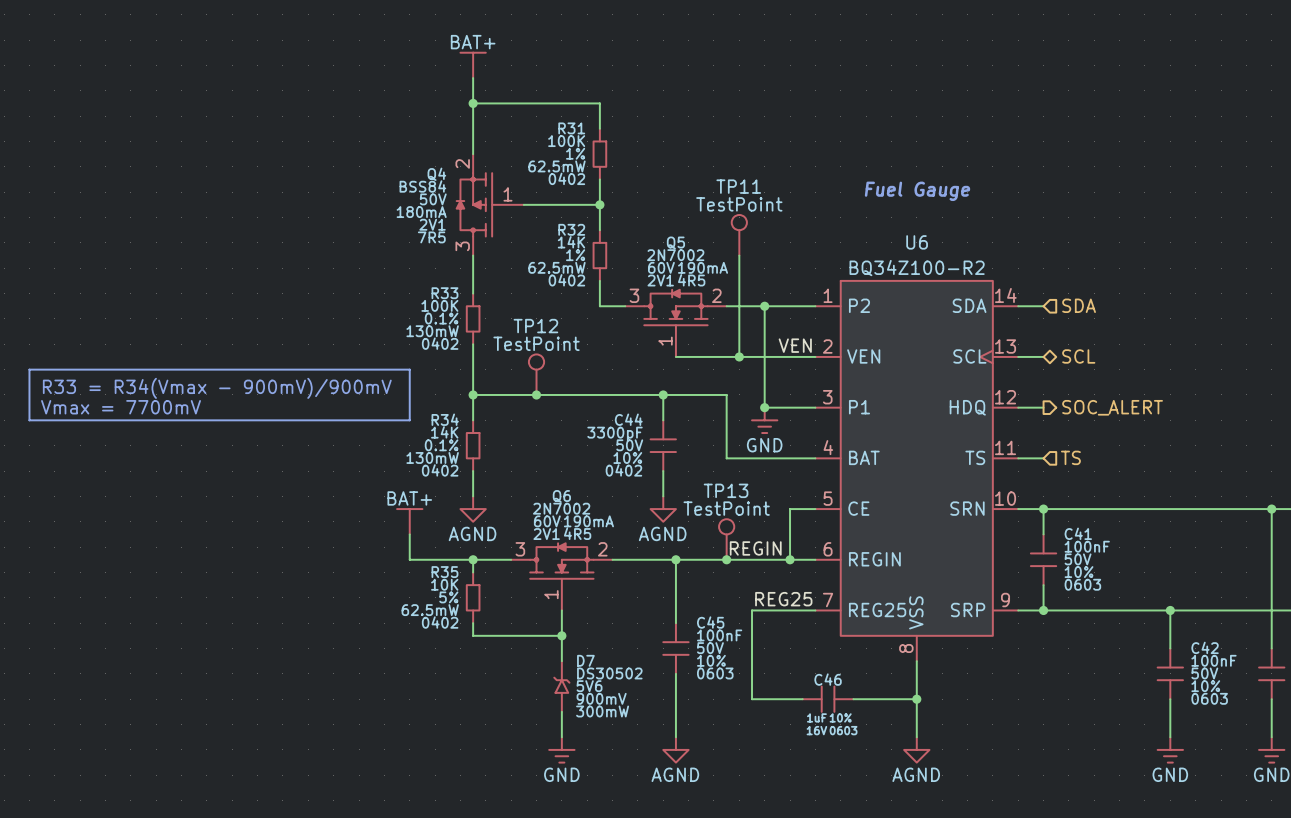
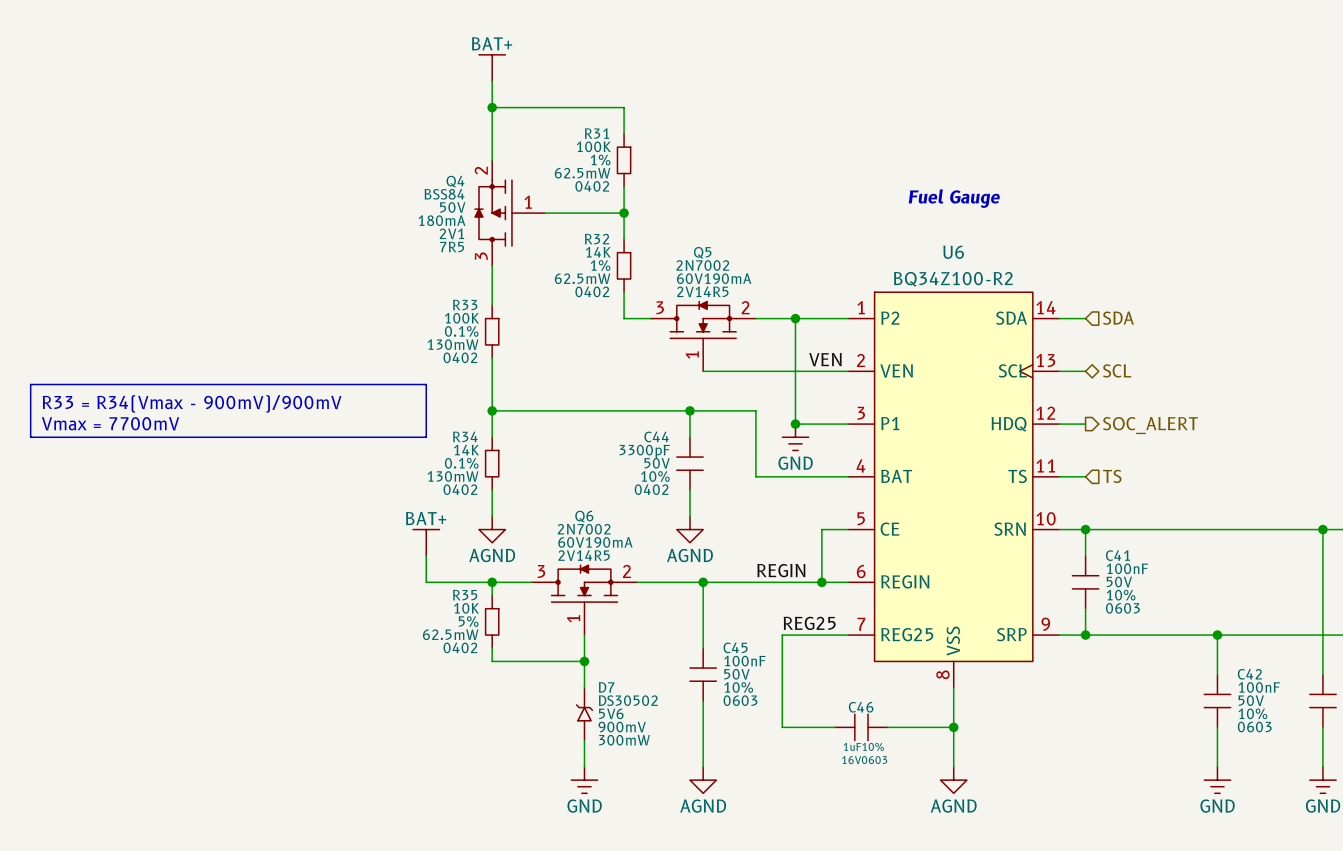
TP11: TestPoint (739, 235) -> none
wire: (739, 255) (739, 356) -> none
junction: (739, 356) -> none
TP12: TestPoint (536, 374) -> none
junction: (536, 394) -> none
TP13: TestPoint (726, 539) -> none
junction: (726, 559) -> none

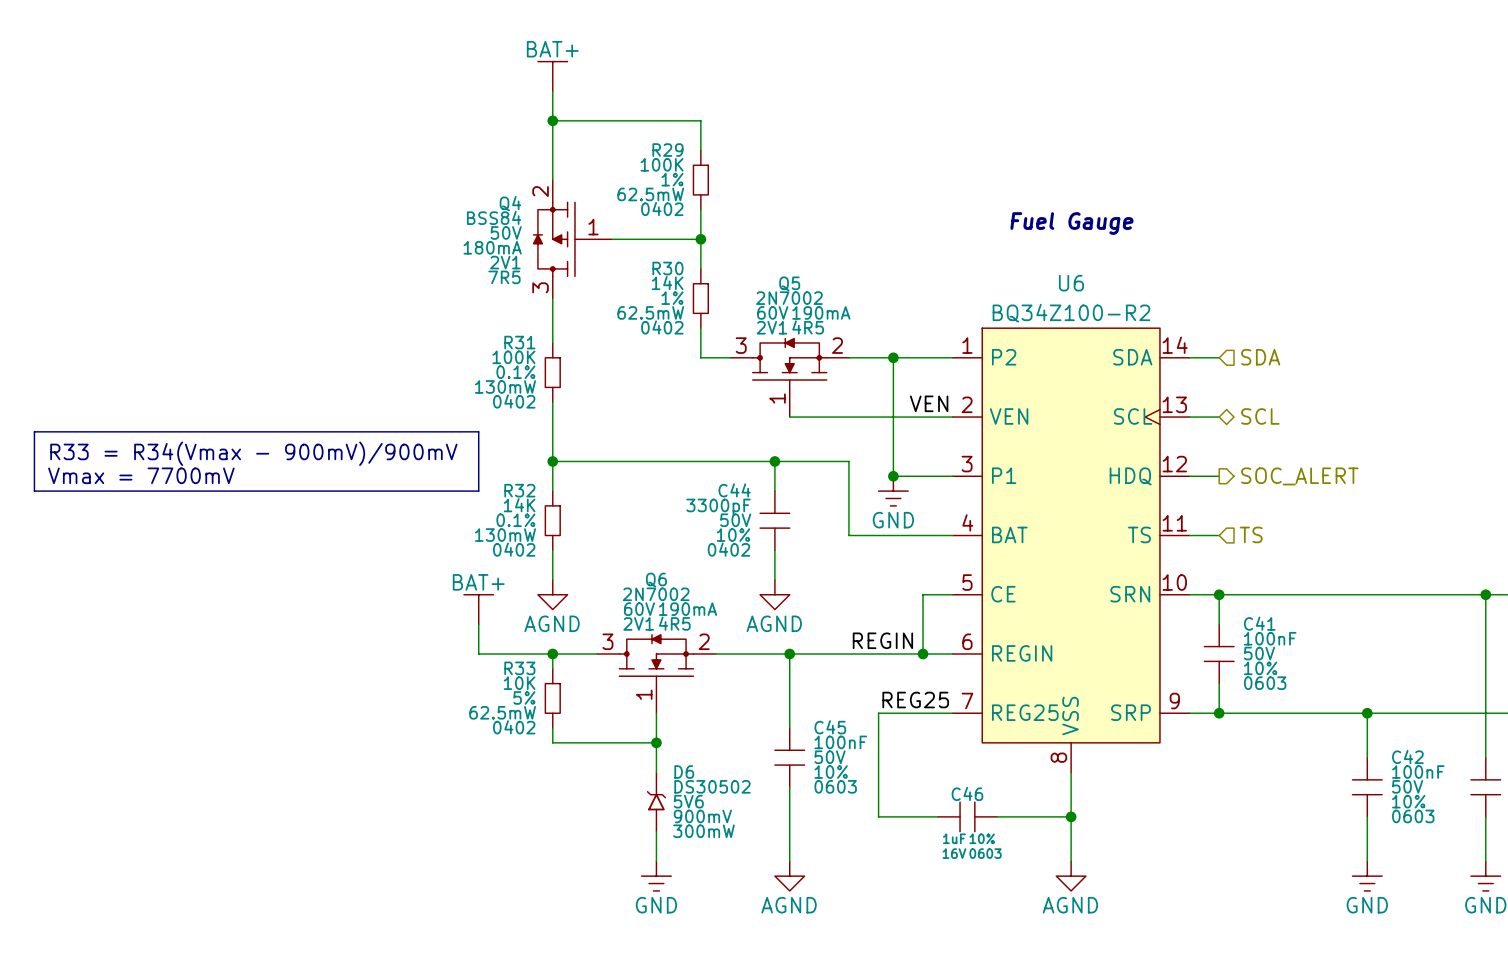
R31 name: R31 (597, 133) -> R29 (667, 150)
R32 name: R32 (597, 239) -> R30 (667, 268)
R33 name: R33 (465, 305) -> R31 (519, 342)
R34 name: R34 (465, 436) -> R32 (519, 490)
R35 name: R35 (465, 595) -> R33 (519, 668)
D7 name: D7 (606, 687) -> D6 (684, 772)

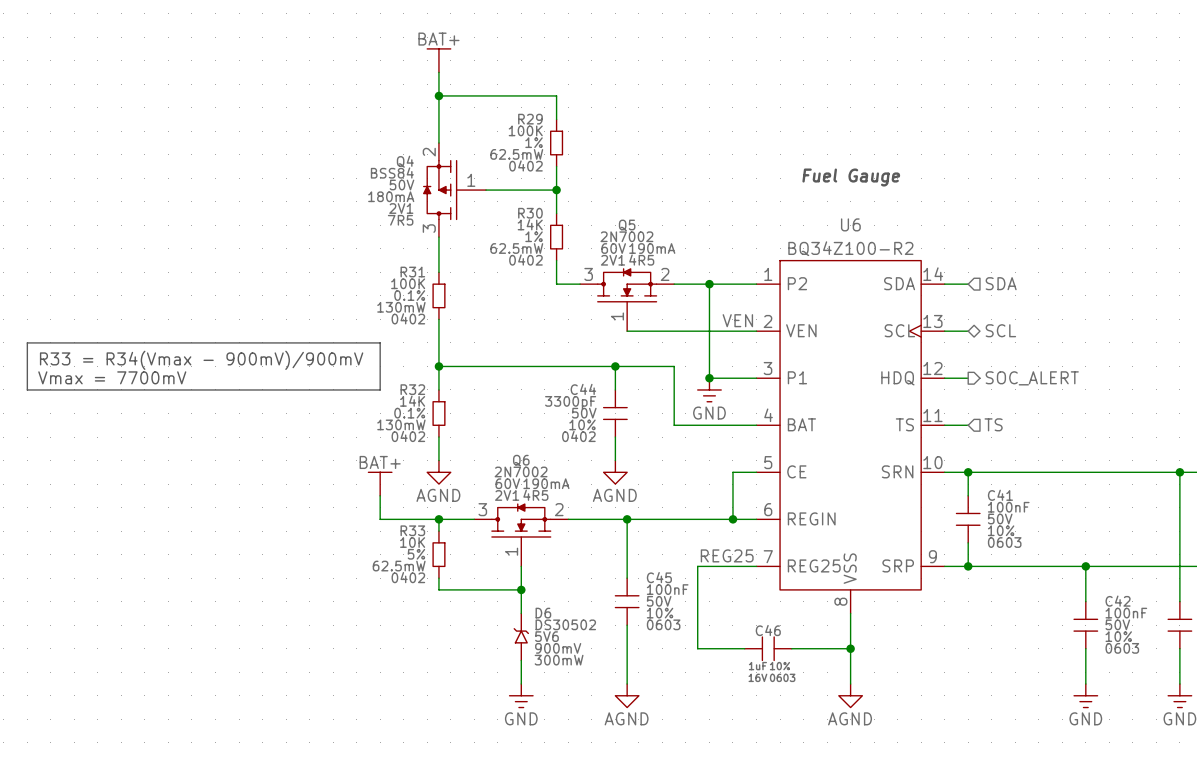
label: REGIN (882, 640) -> none

